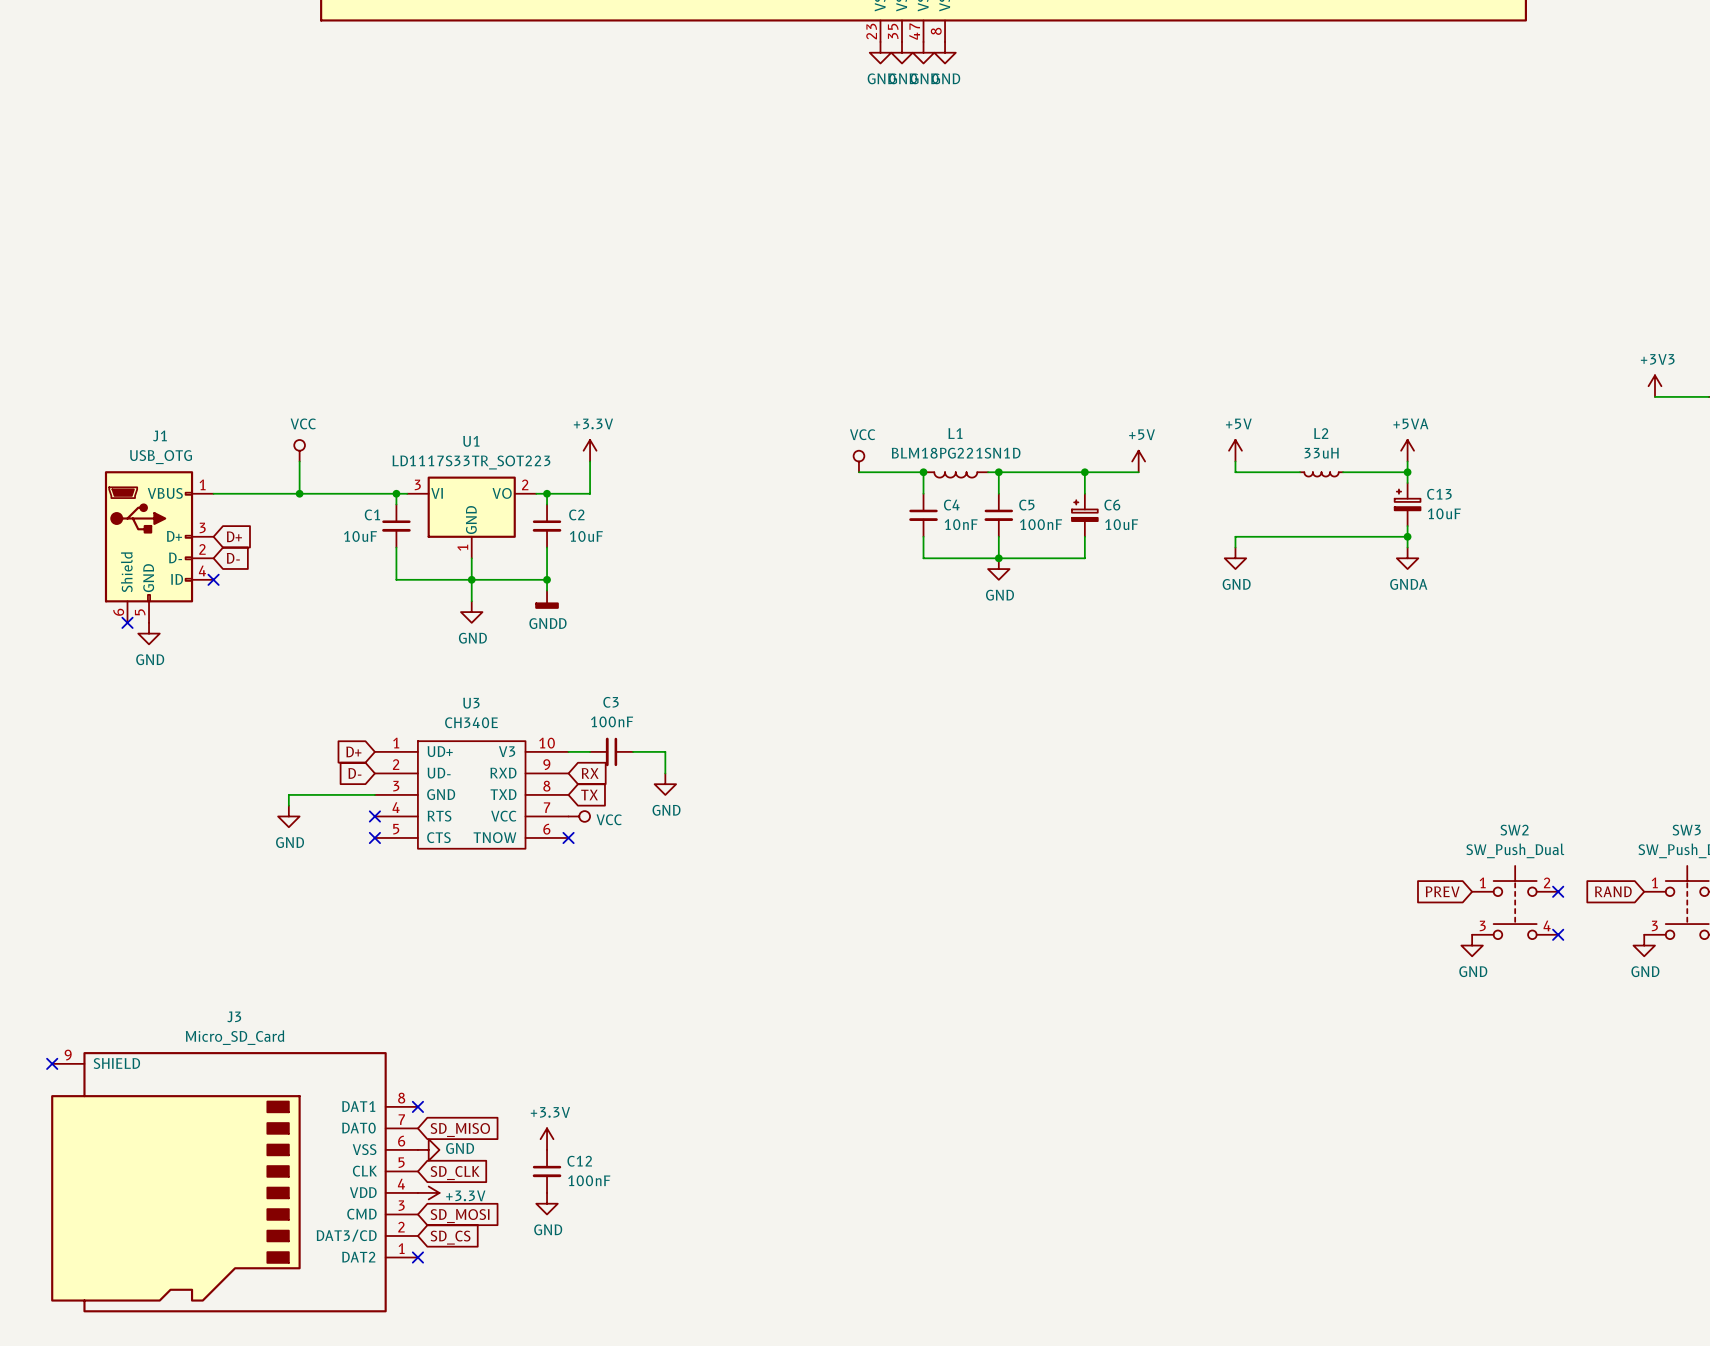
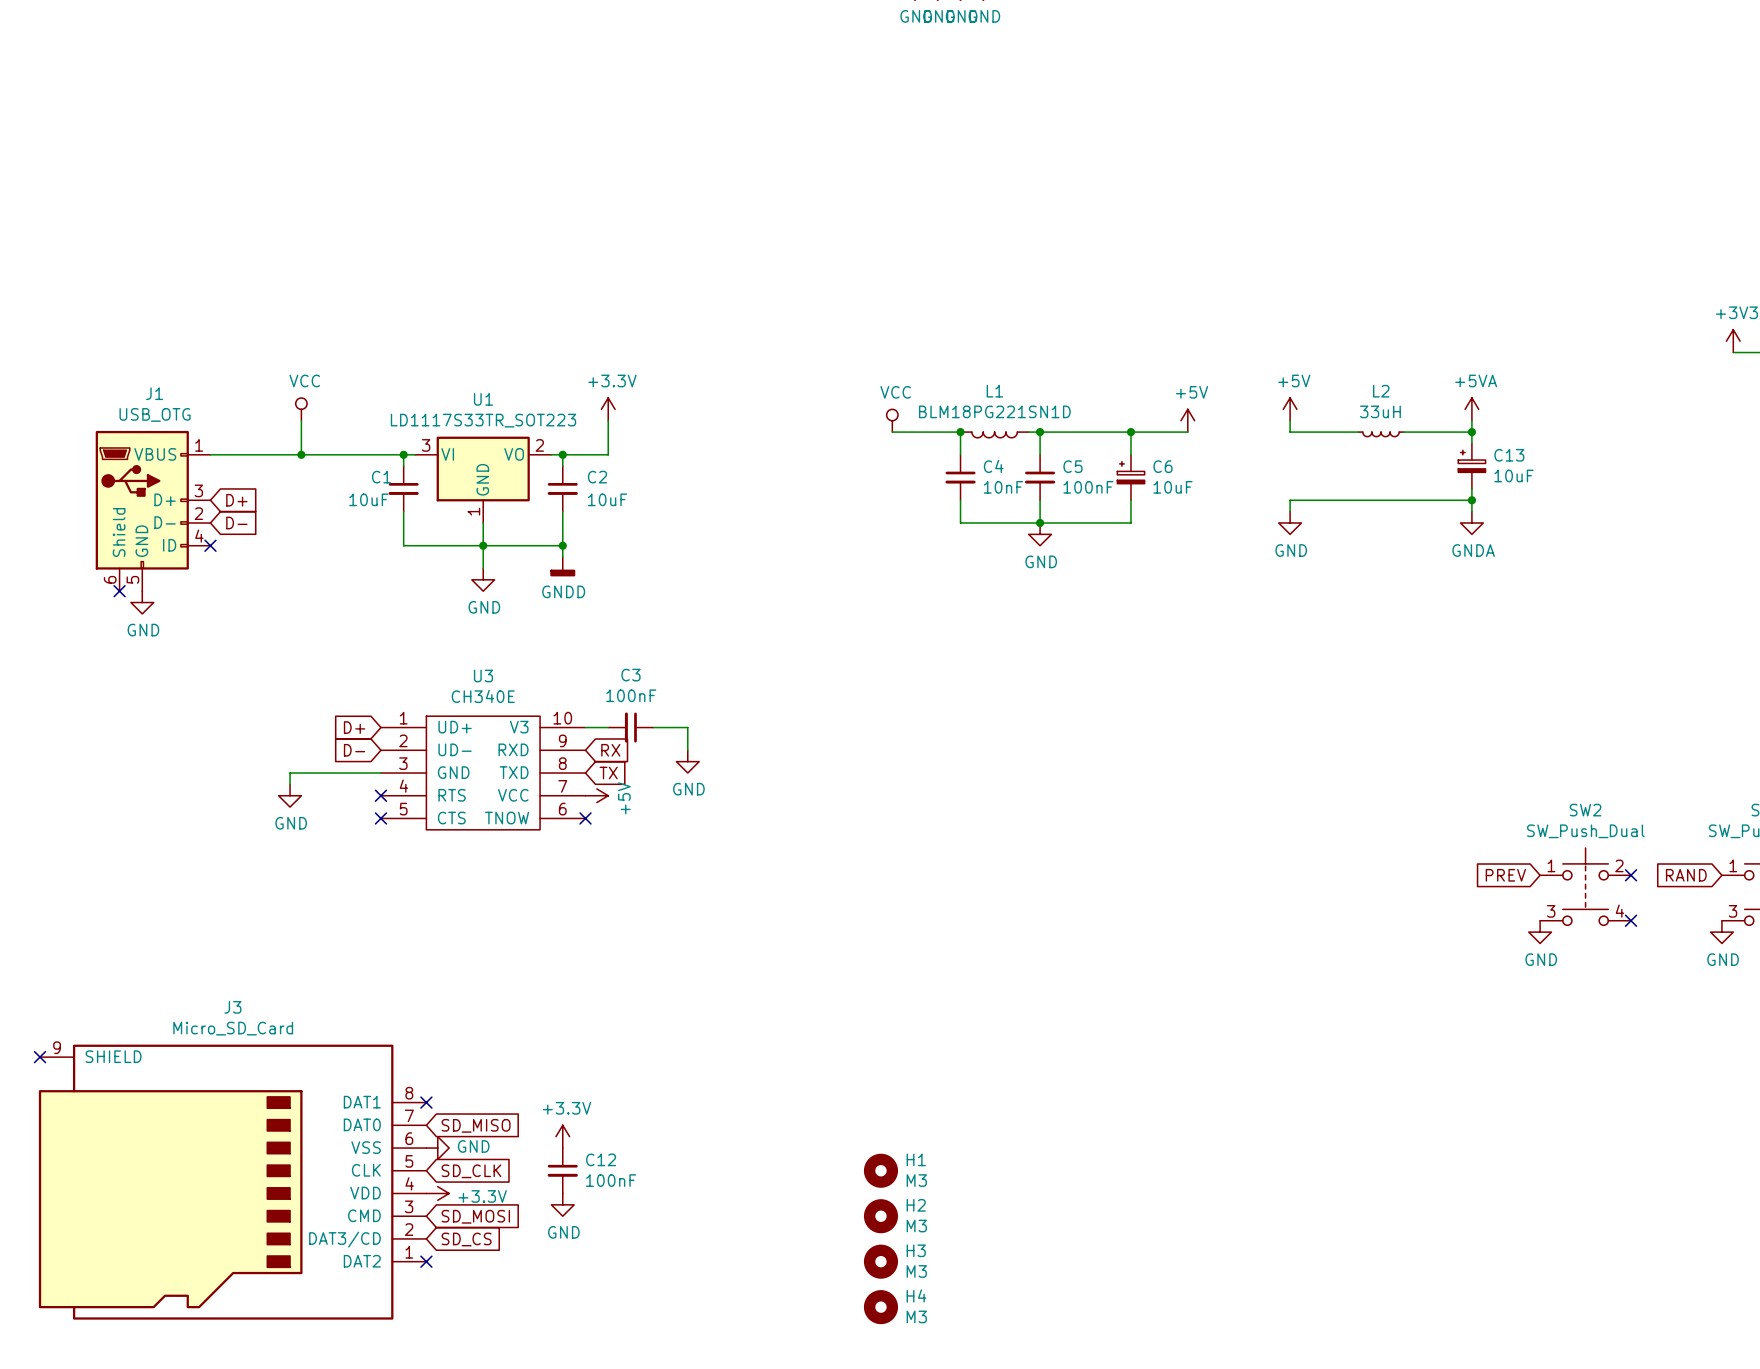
power symbol: VCC (579, 816) -> +5V (596, 795)
H1: none -> M3 (880, 1170)
H2: none -> M3 (880, 1216)
H3: none -> M3 (880, 1261)
H4: none -> M3 (880, 1307)

